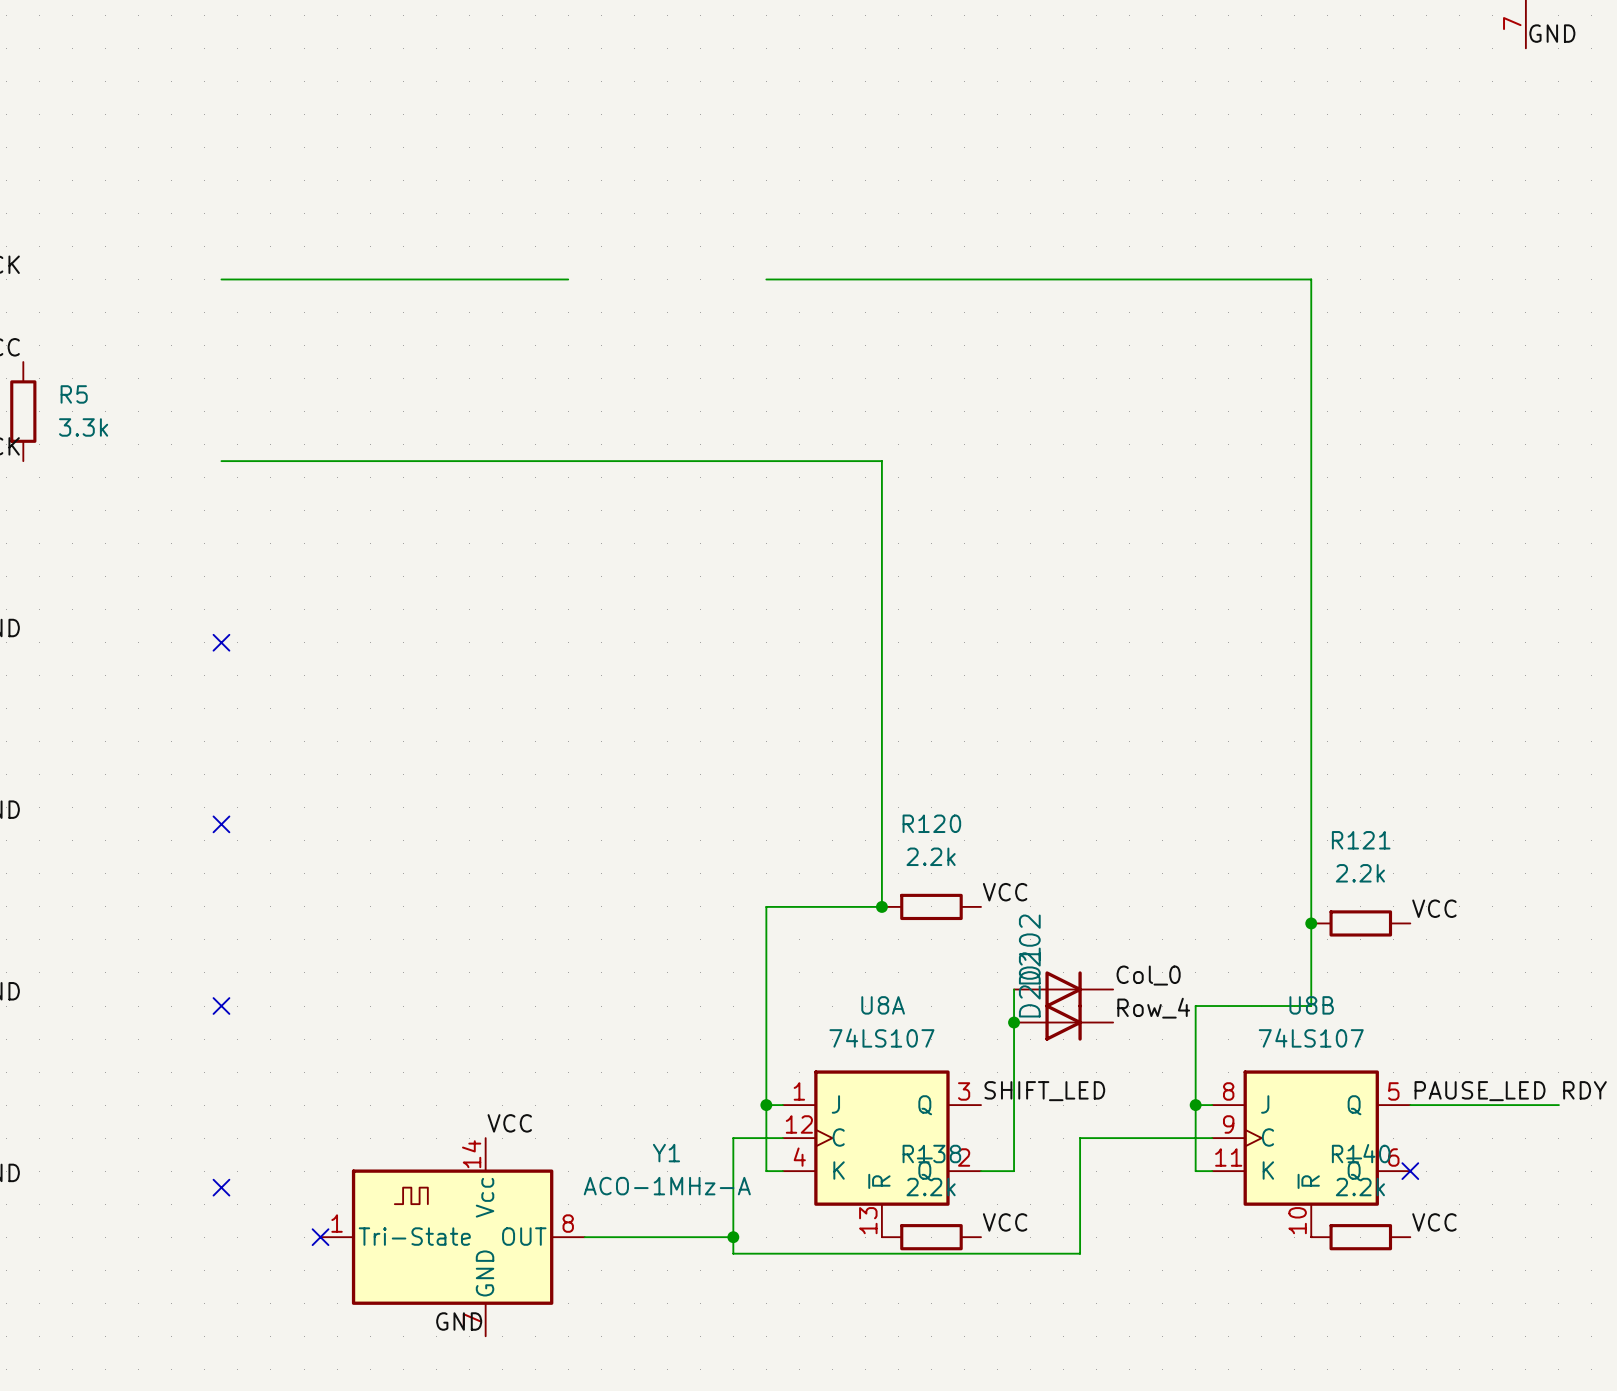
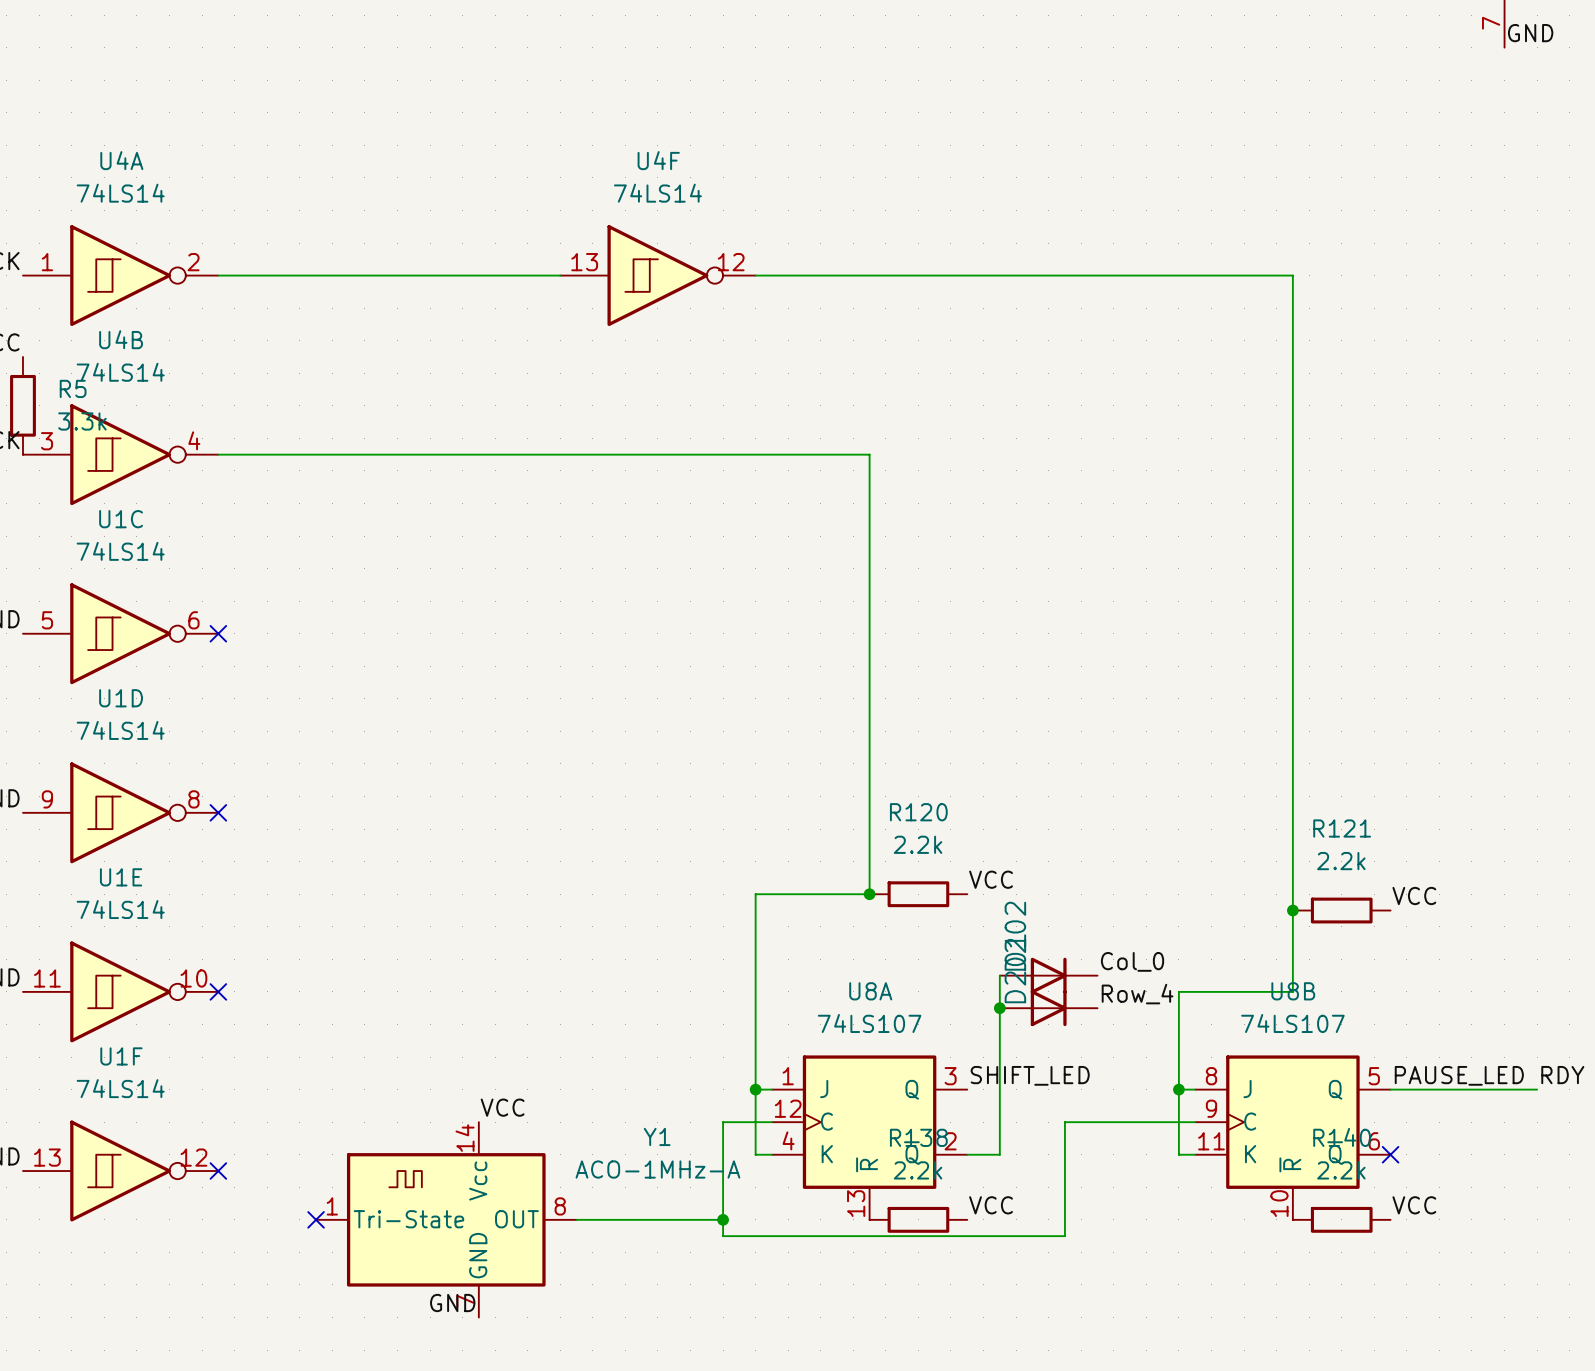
U4A: none -> 74LS14 (120, 275)
U4F: none -> 74LS14 (657, 275)
U4B: none -> 74LS14 (120, 454)
U1C: none -> 74LS14 (120, 633)
U1D: none -> 74LS14 (120, 812)
U1E: none -> 74LS14 (120, 991)
U1F: none -> 74LS14 (120, 1171)

